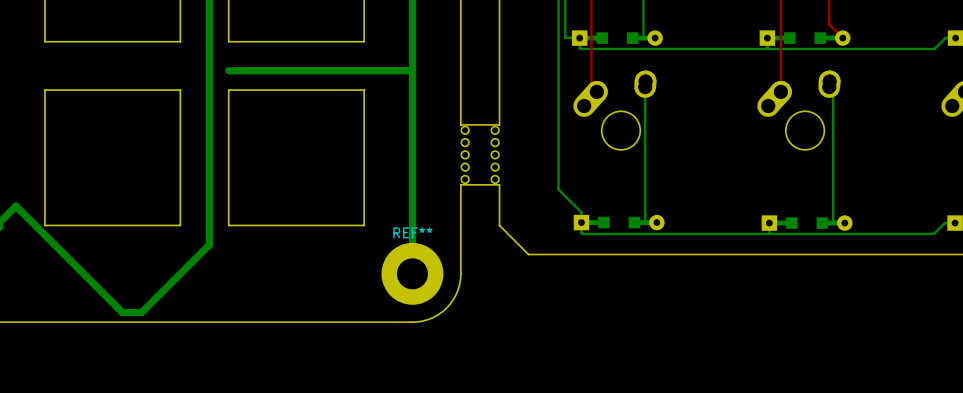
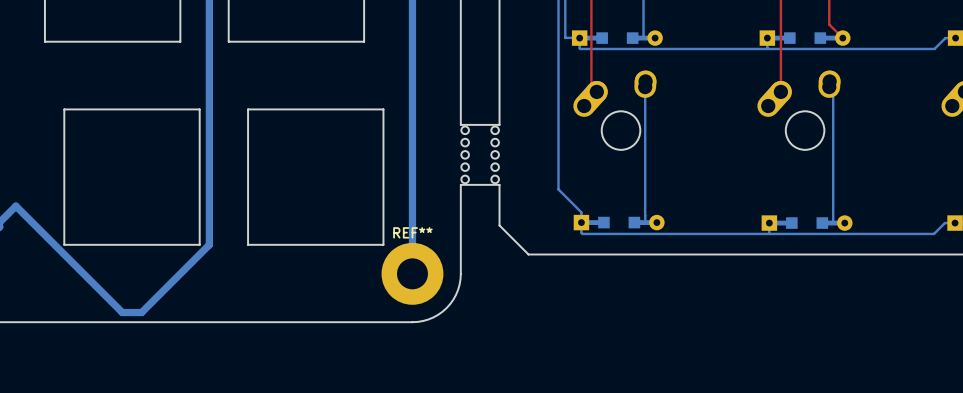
bottom track: (228, 70) (412, 70) -> none
board edge: (44, 90) (44, 225) (180, 225) (180, 90) (44, 90) -> (64, 109) (64, 244) (199, 244) (199, 109) (64, 109)
board edge: (228, 90) (228, 225) (364, 225) (364, 90) (228, 90) -> (248, 109) (248, 244) (383, 244) (383, 109) (248, 109)

